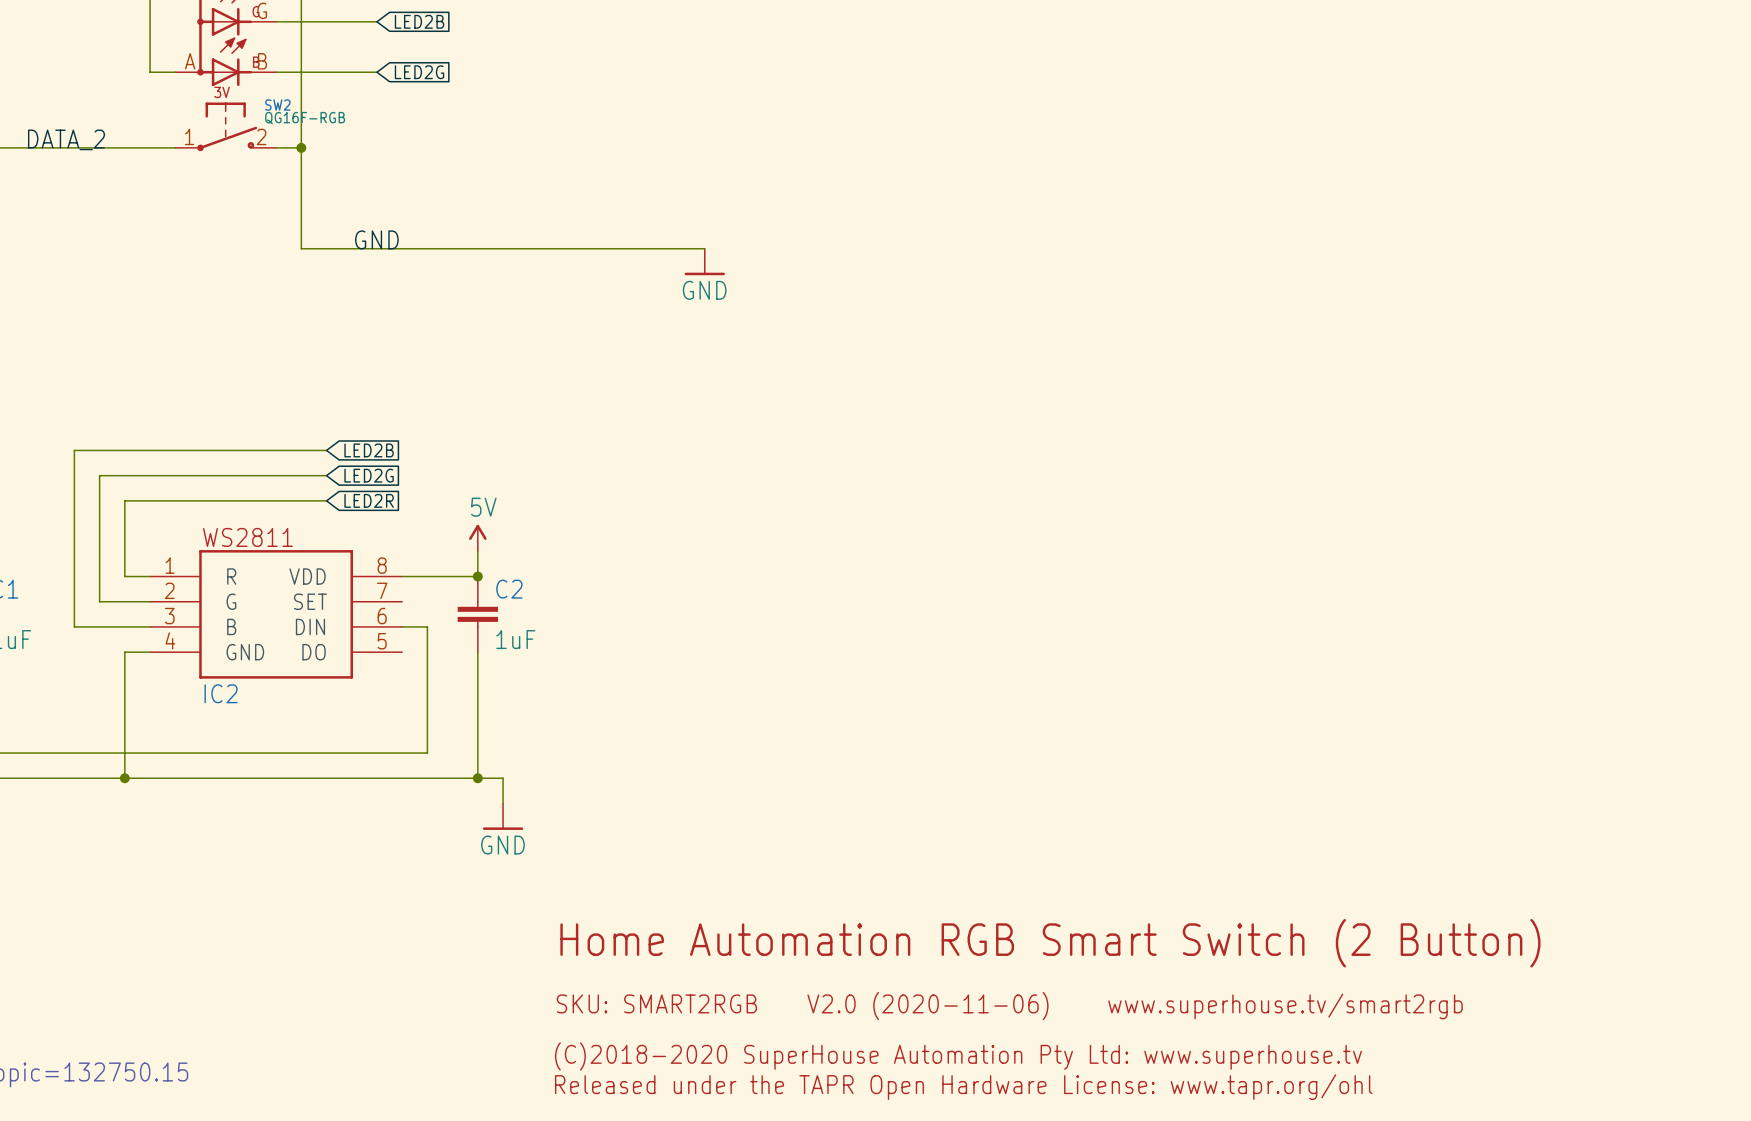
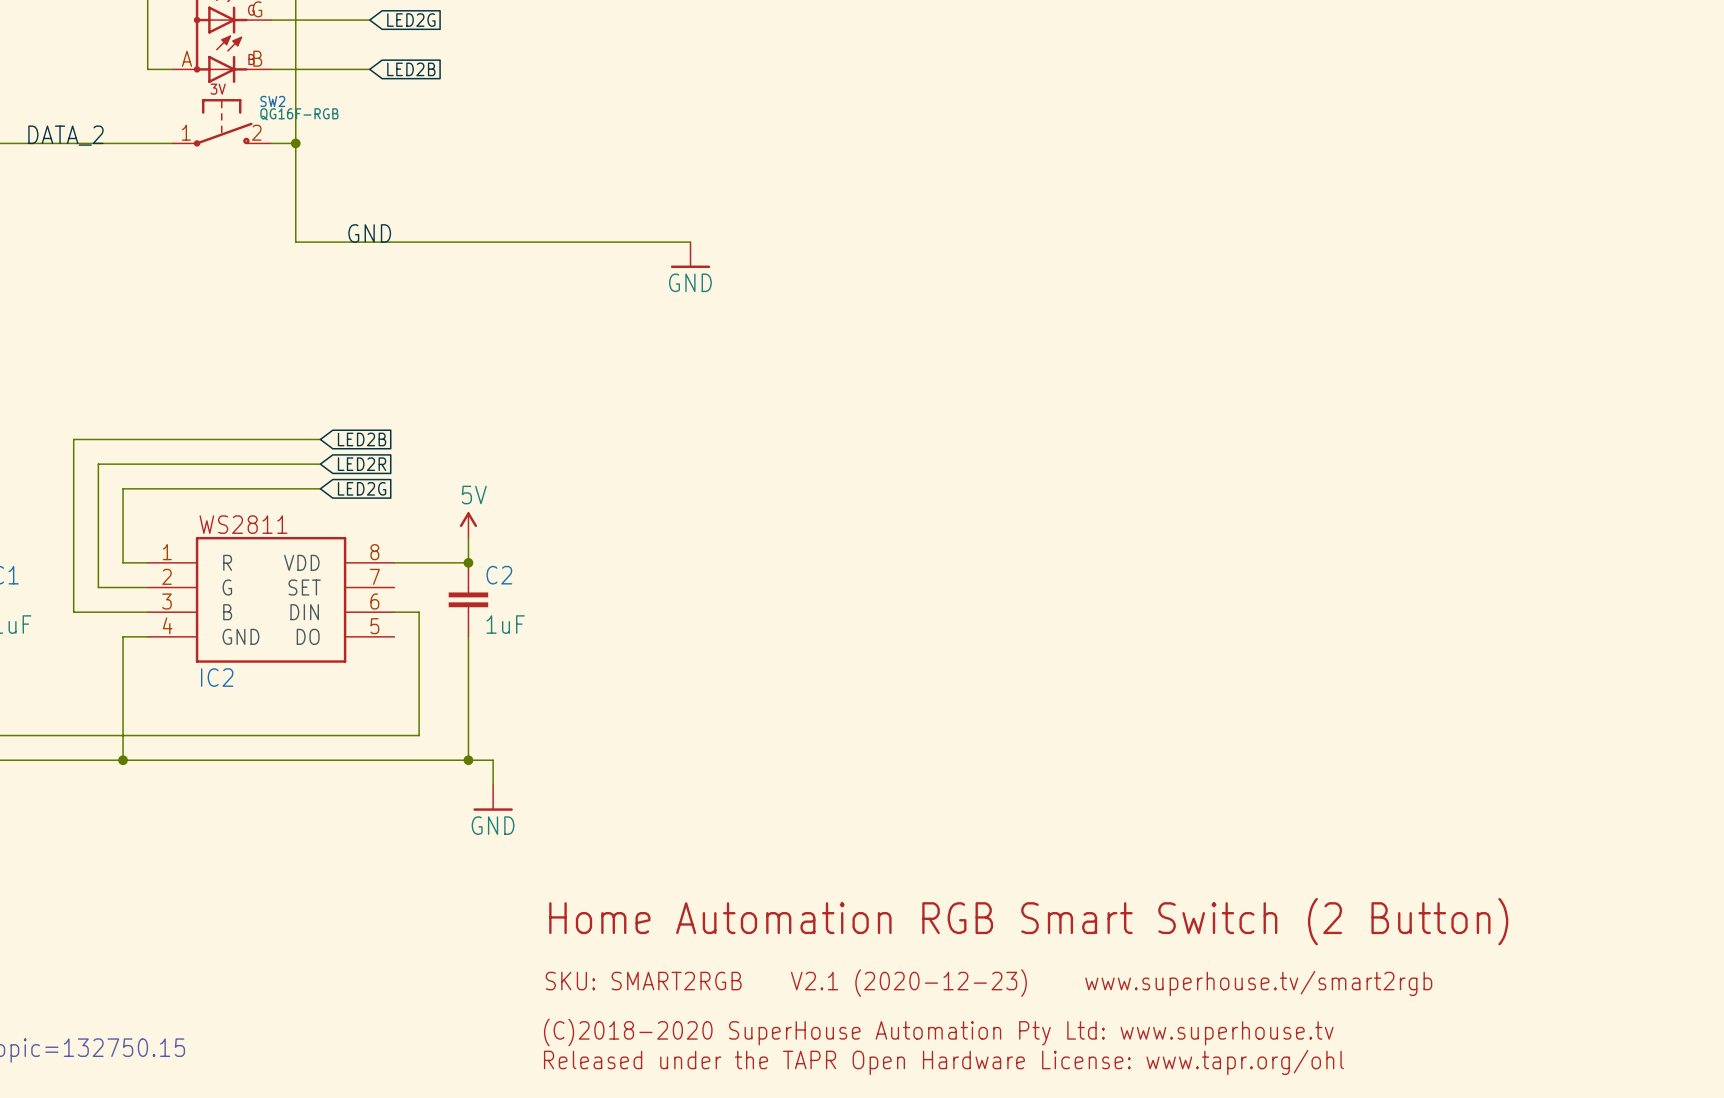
global label: LED2B (419, 21) -> LED2G (411, 20)
global label: LED2G (419, 72) -> LED2B (411, 69)
global label: LED2G (369, 475) -> LED2R (362, 464)
global label: LED2R (369, 500) -> LED2G (362, 488)
text: V2.0 (2020-11-06) (927, 1006) -> V2.1 (2020-12-23) (908, 983)

